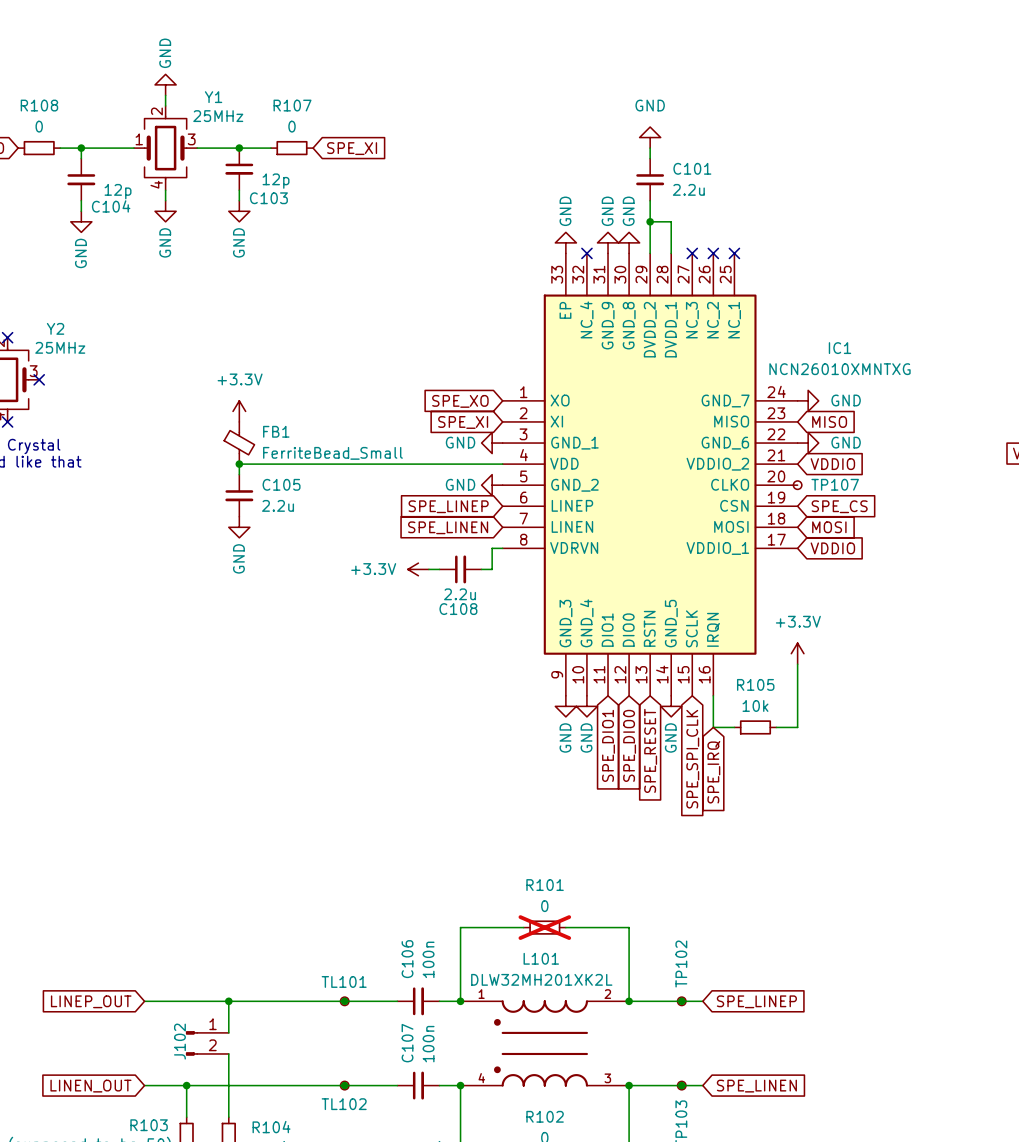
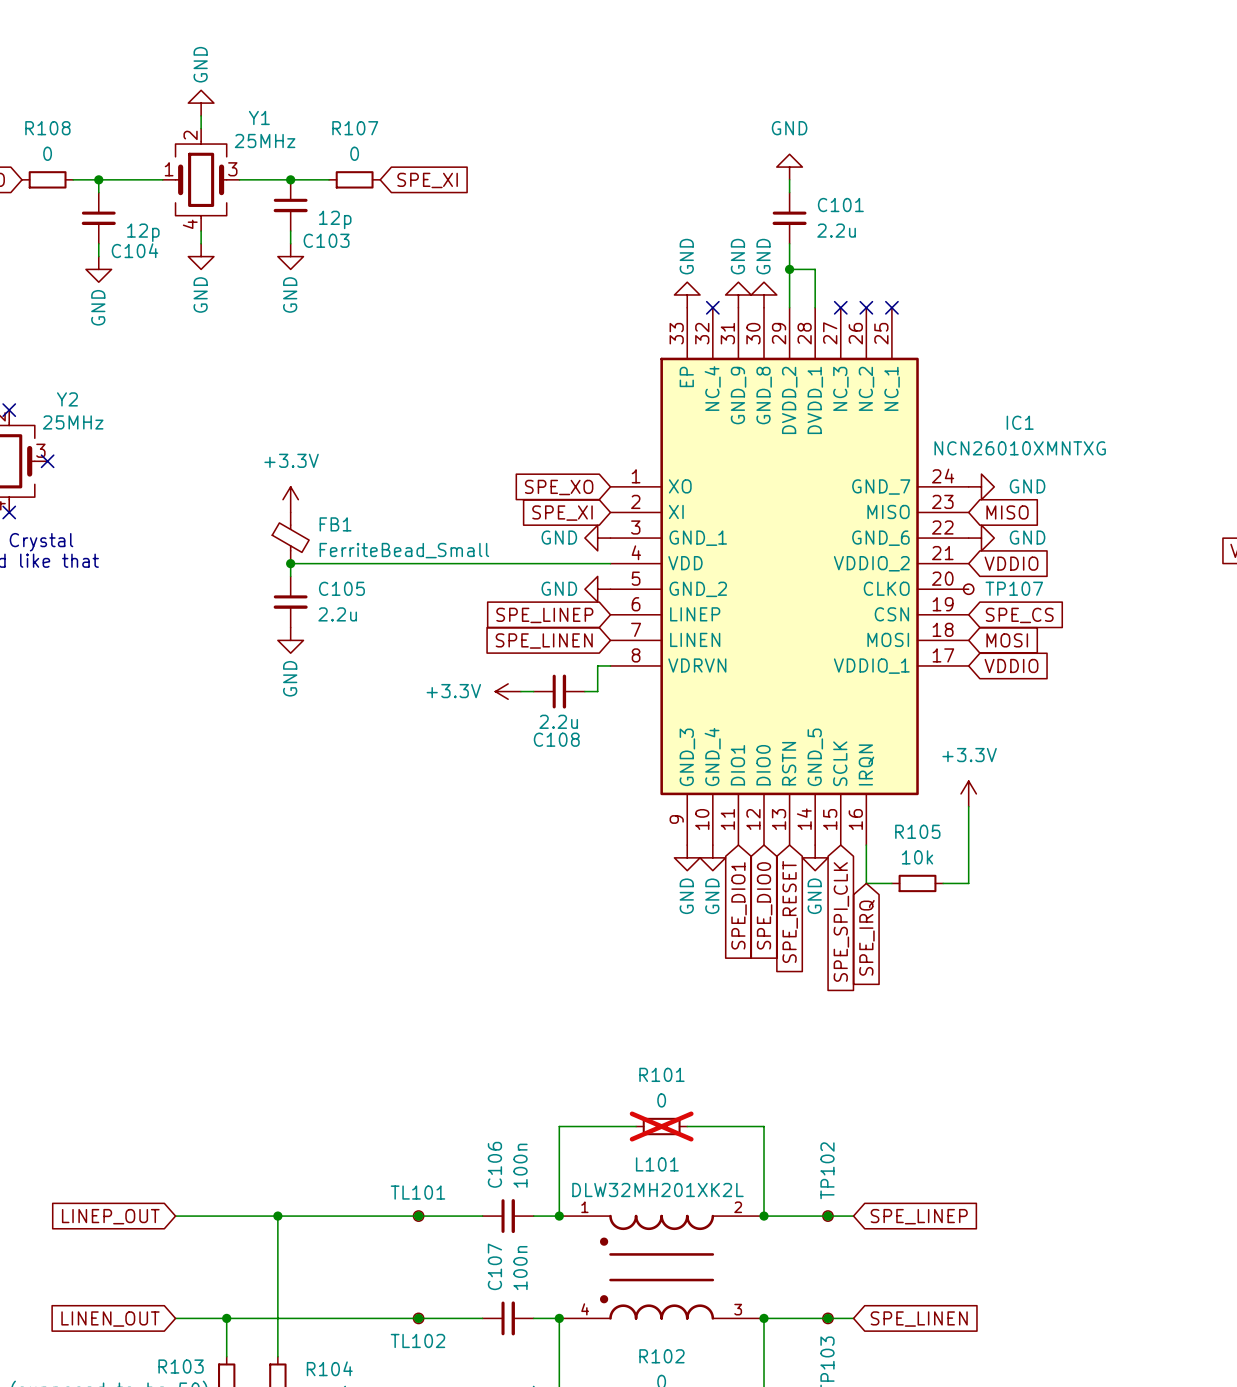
wire: none -> (277, 1254) (277, 1280)
J102: (207, 1043) -> none

